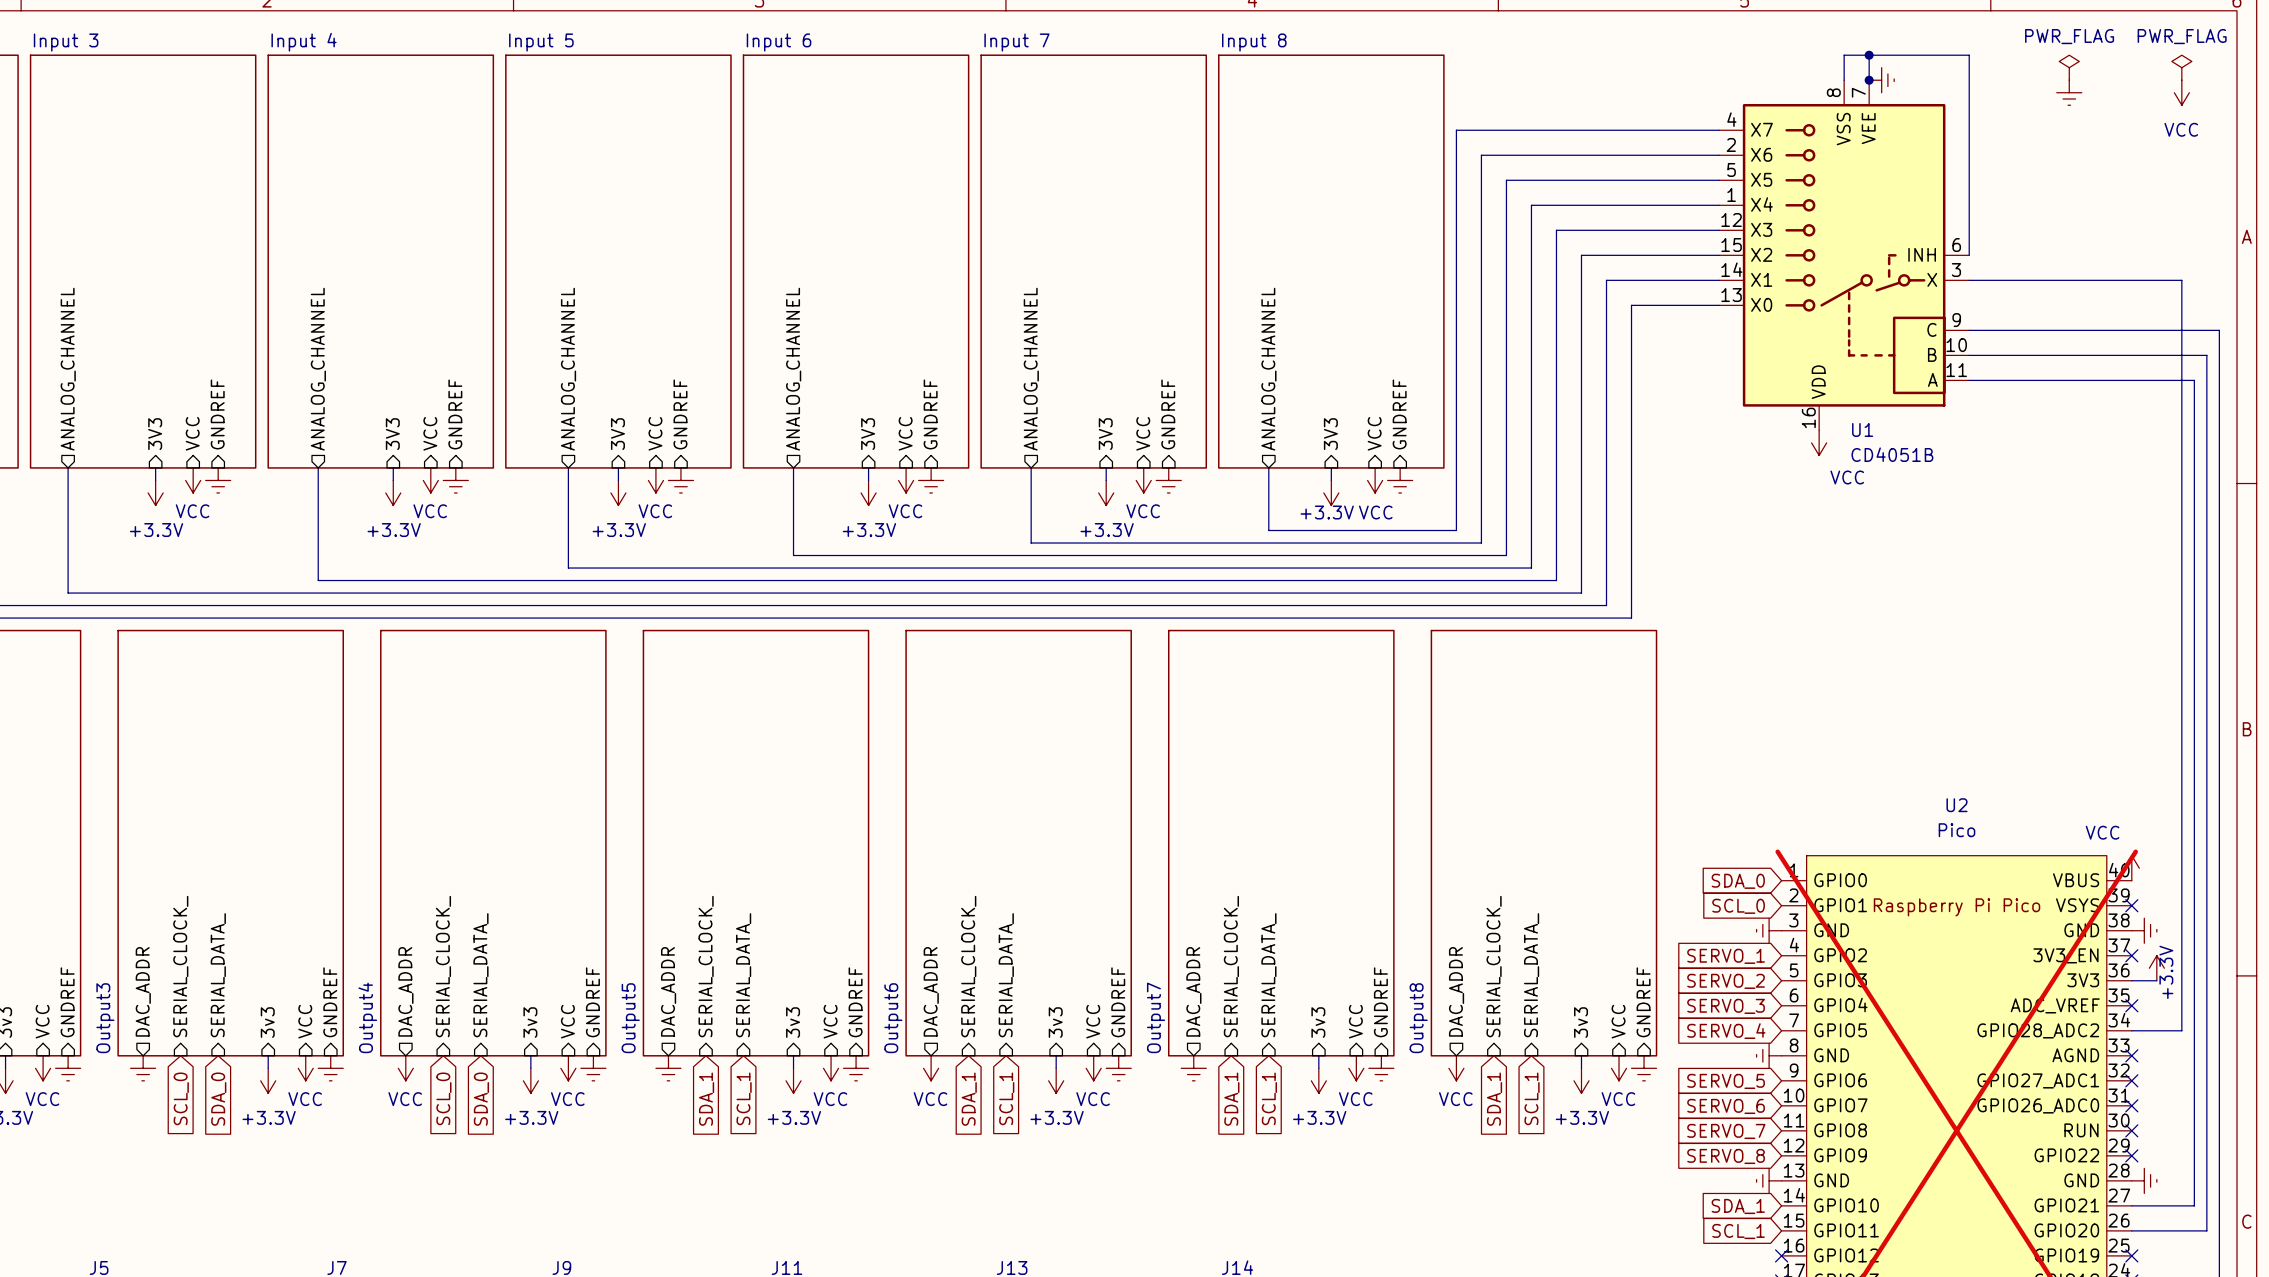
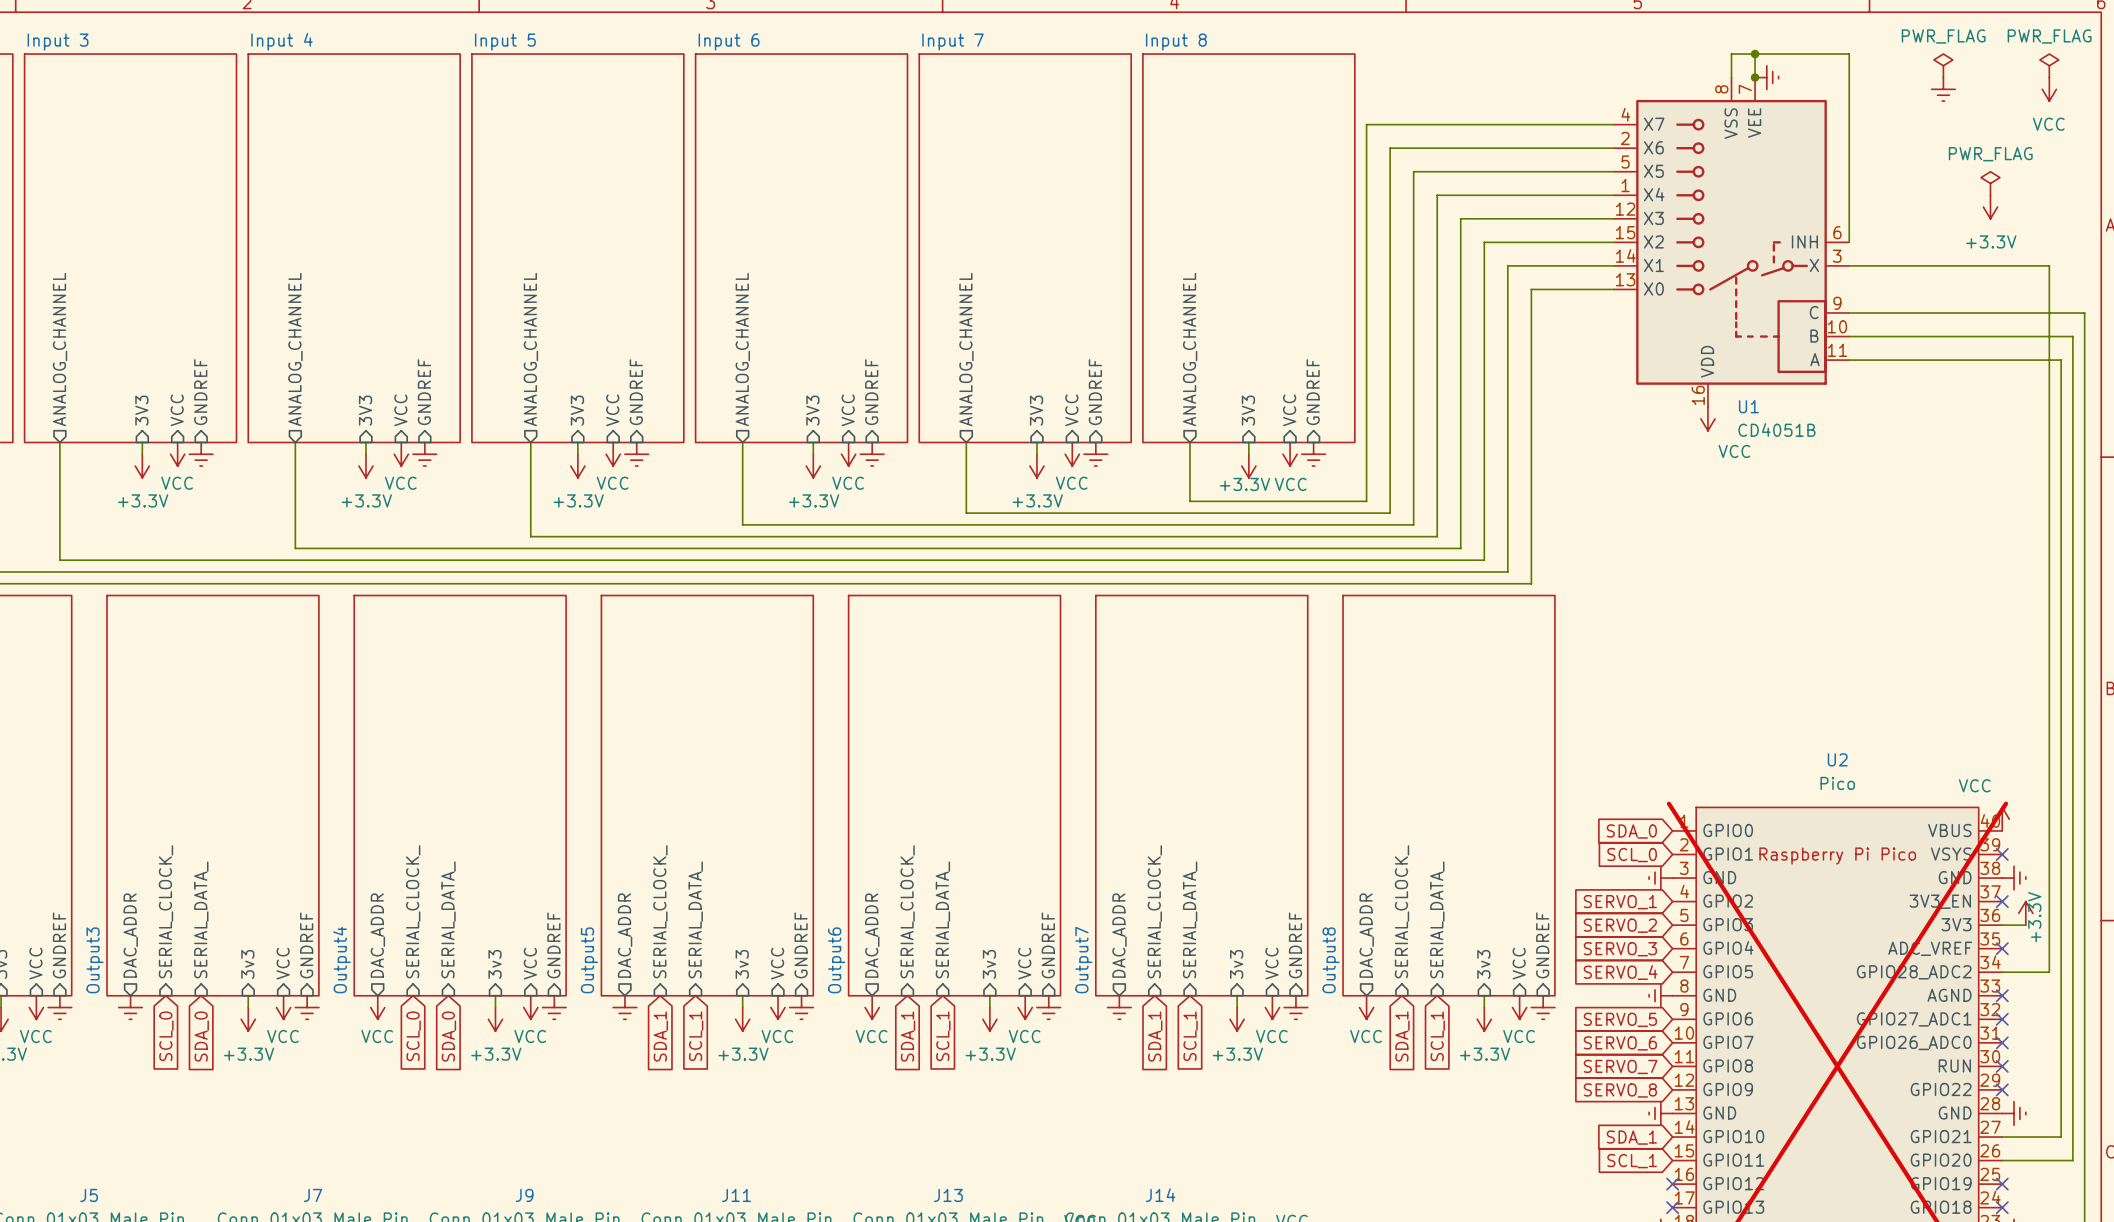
power symbol: none -> PWR_FLAG (1990, 183)
power symbol: none -> +3.3V (1990, 207)

